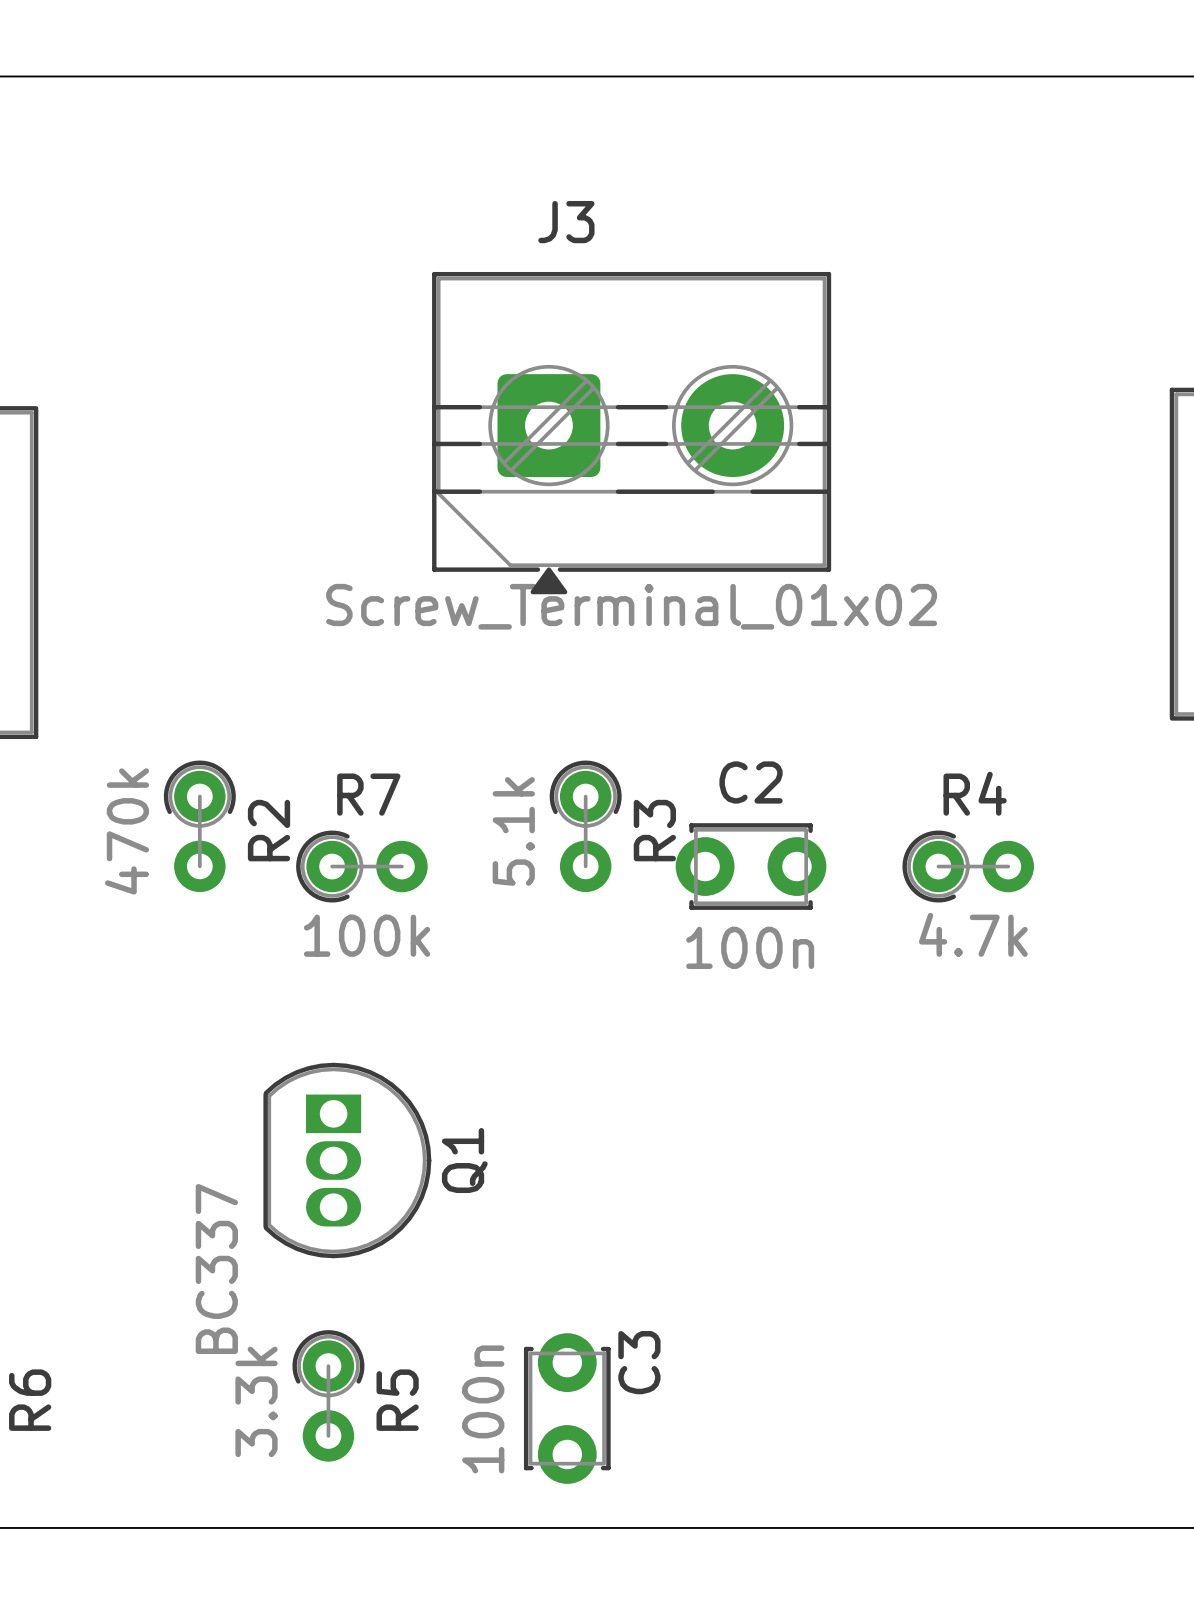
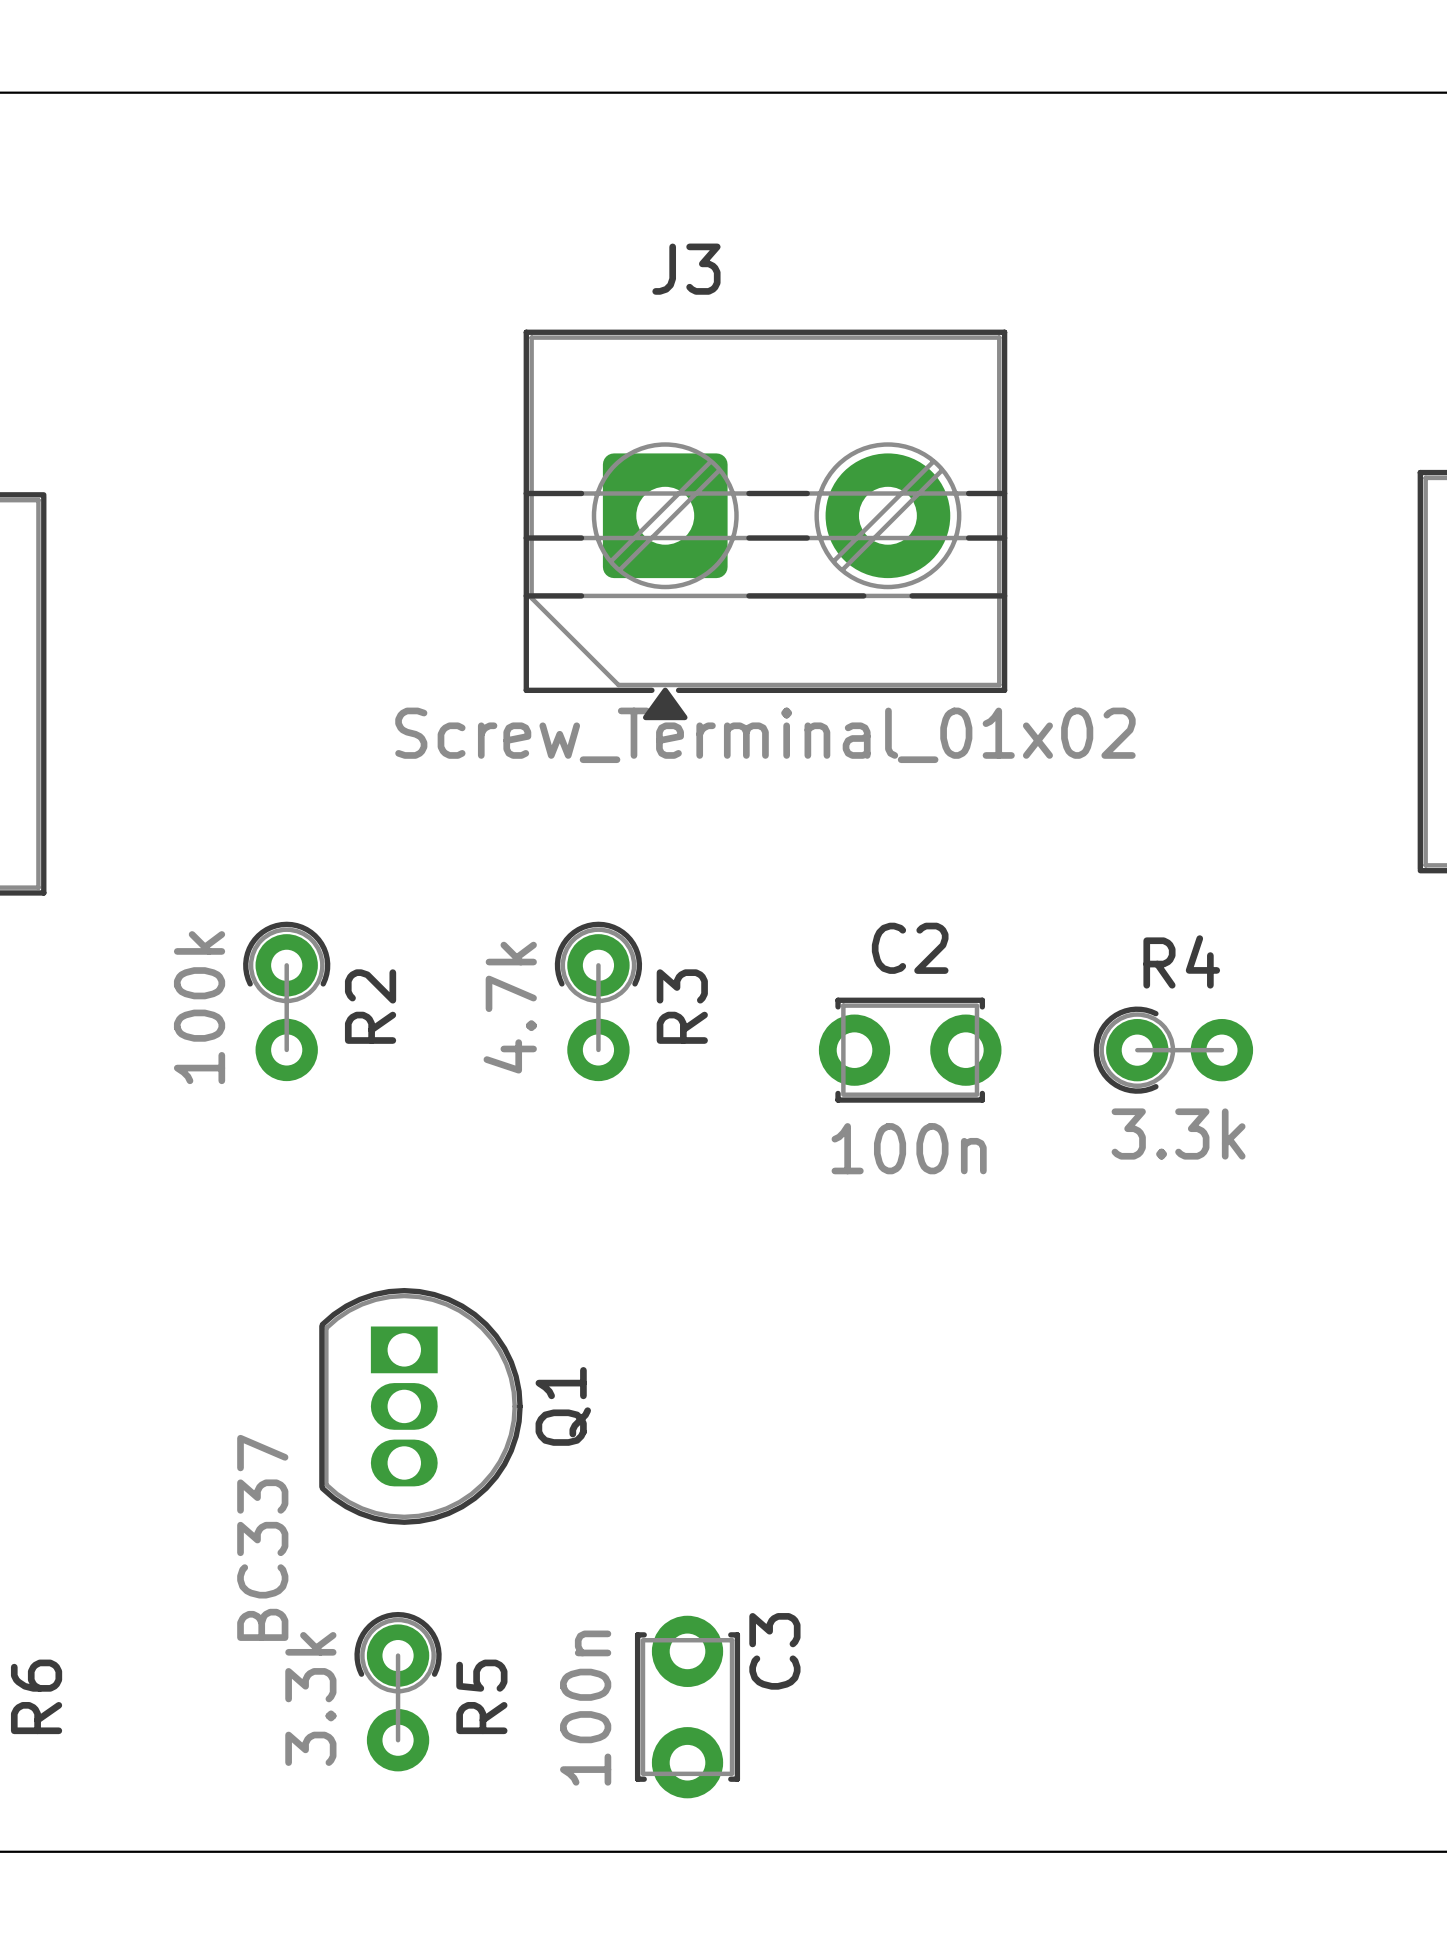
R2 position: (199, 826) -> (286, 1001)
R3 position: (585, 826) -> (598, 1001)
R2 value: 470k (127, 831) -> 100k (199, 1007)
R3 value: 5.1k (513, 831) -> 4.7k (510, 1007)
R7: 100k (361, 866) -> none
R4 value: 4.7k (973, 934) -> 3.3k (1178, 1134)

